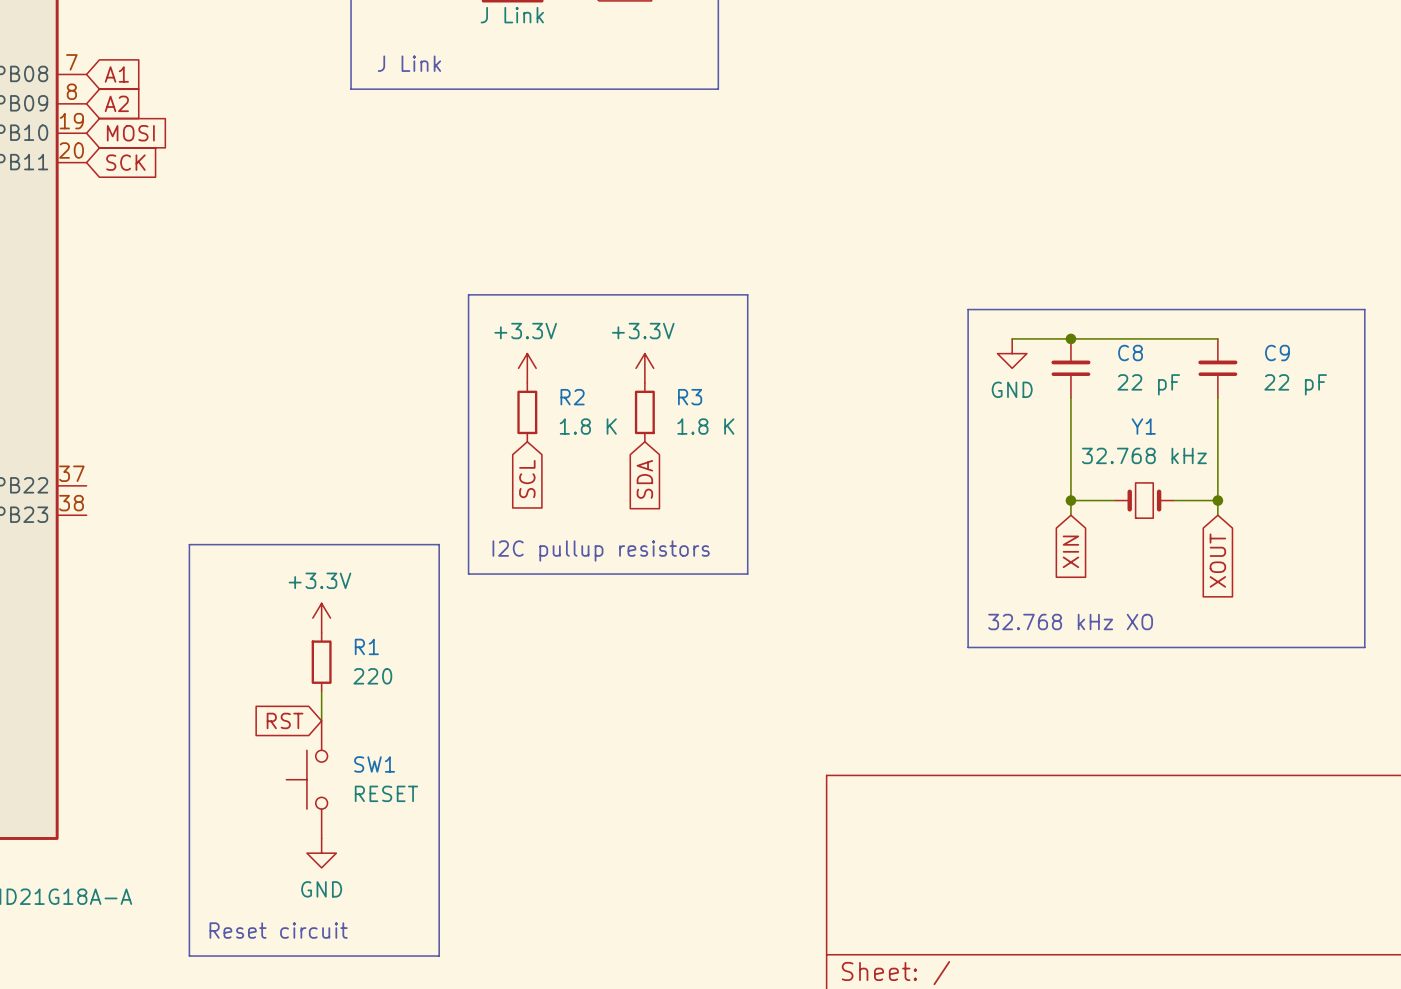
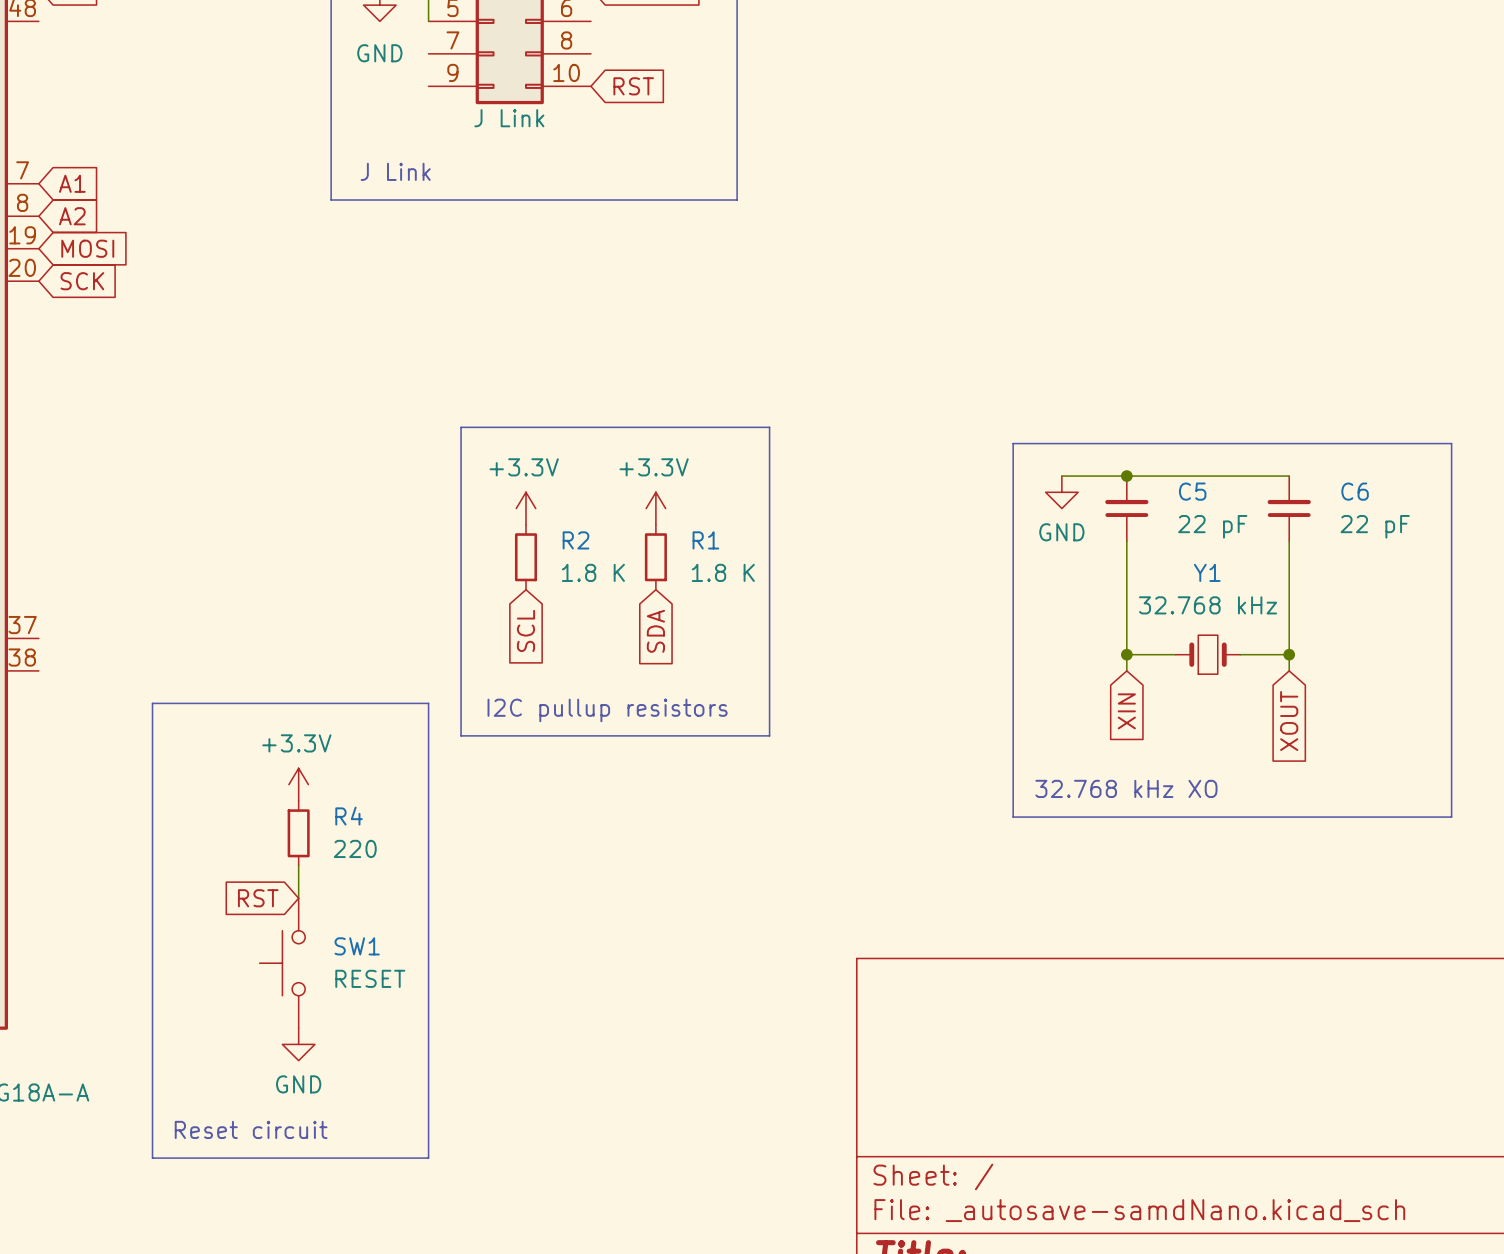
C8 name: C8 (1130, 353) -> C5 (1192, 491)
C9 name: C9 (1277, 353) -> C6 (1355, 491)
R3 name: R3 (690, 397) -> R1 (705, 540)
R1 name: R1 (366, 646) -> R4 (349, 816)

